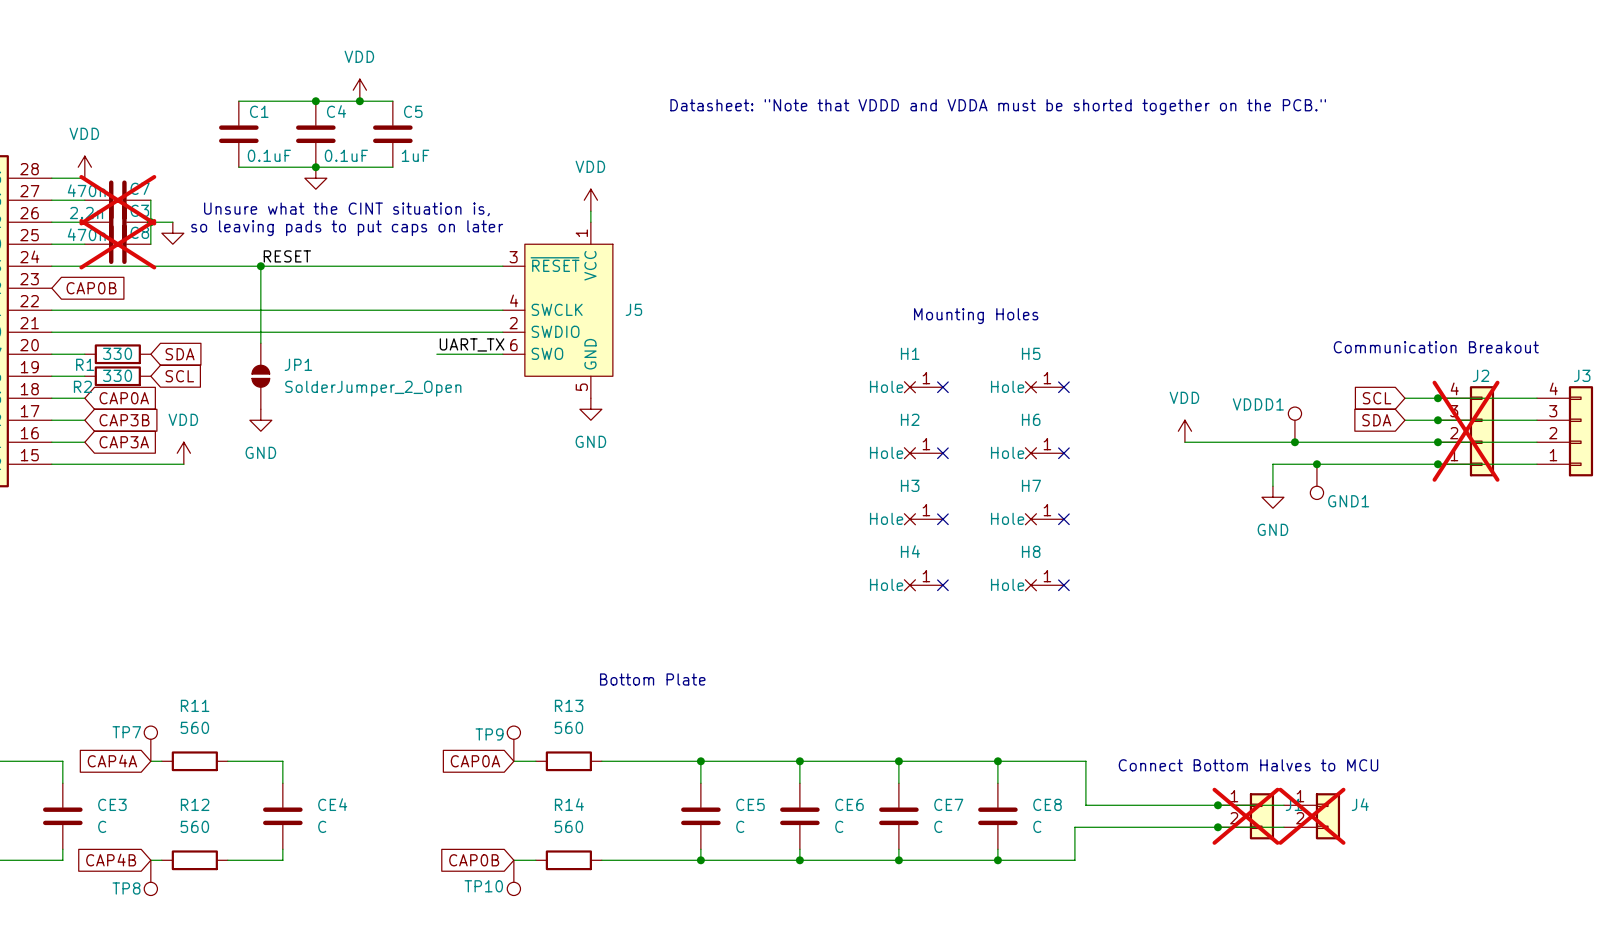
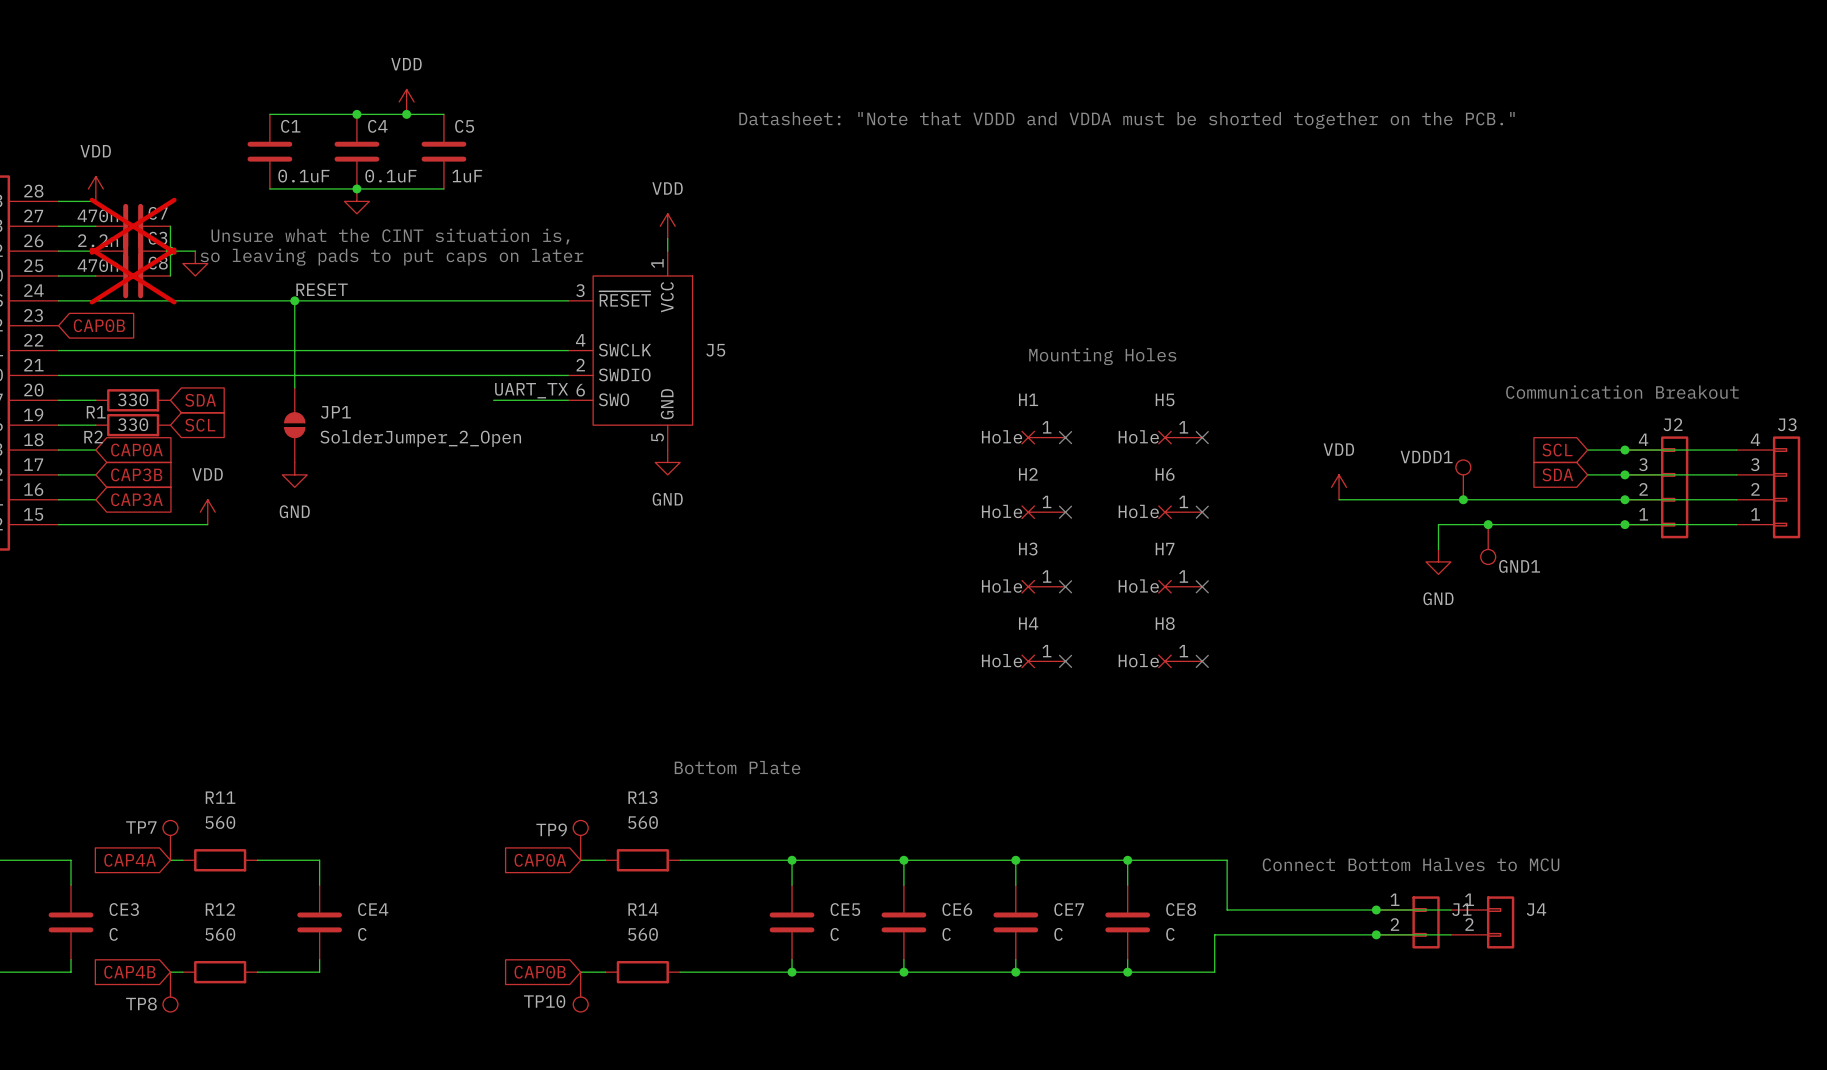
J2 do-not-place cross: (1466, 431) -> none
J1 do-not-place cross: (1245, 816) -> none
J4 do-not-place cross: (1312, 816) -> none

